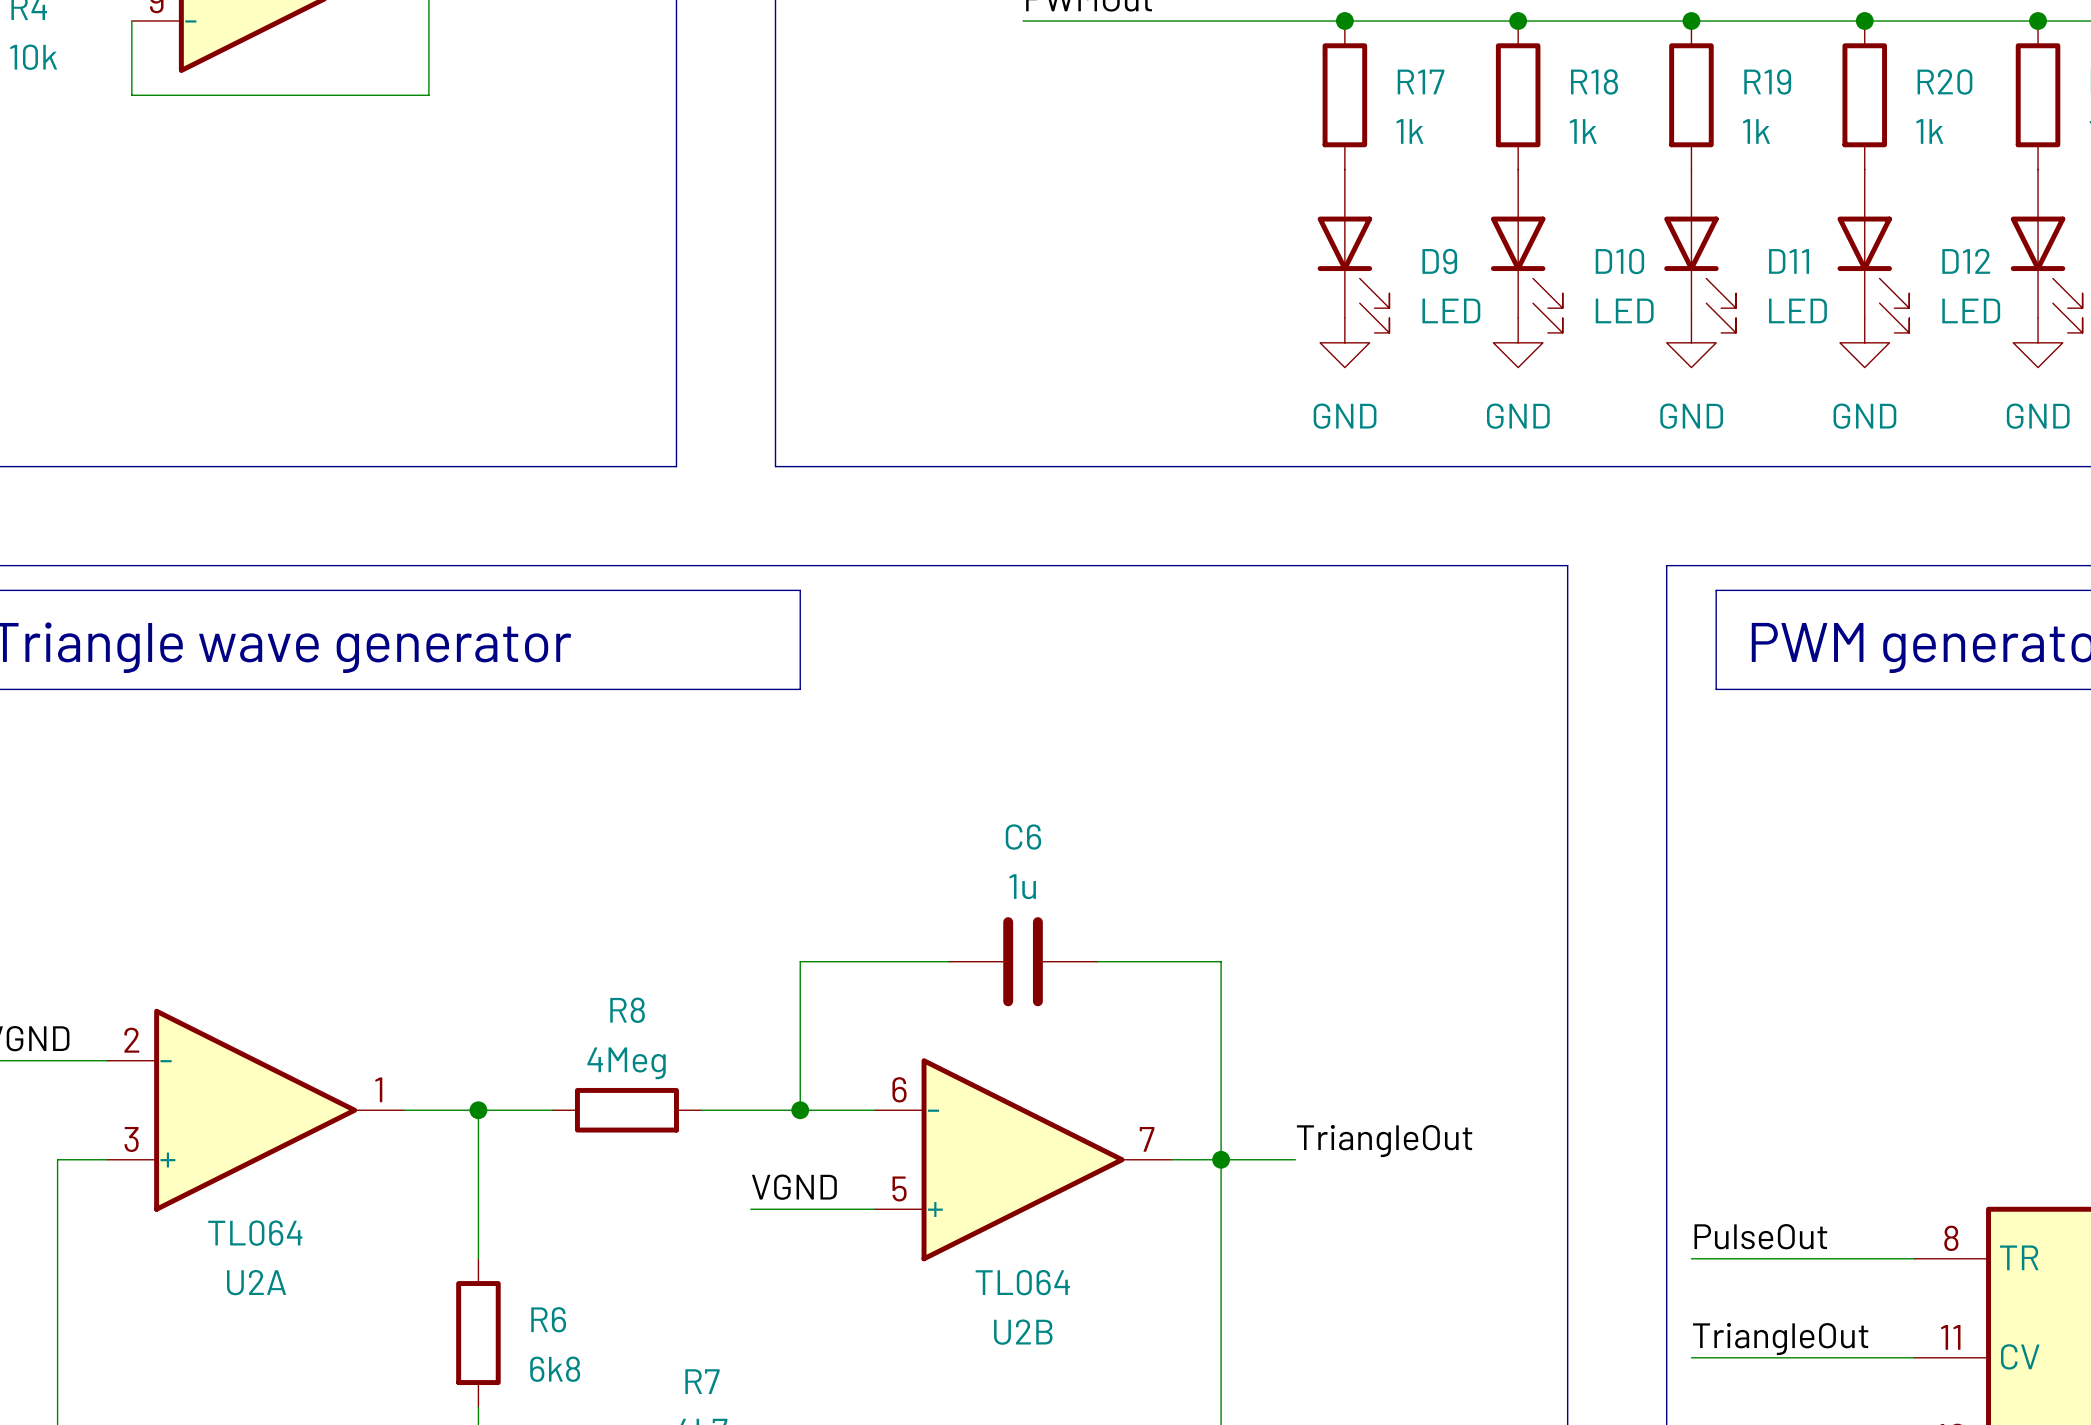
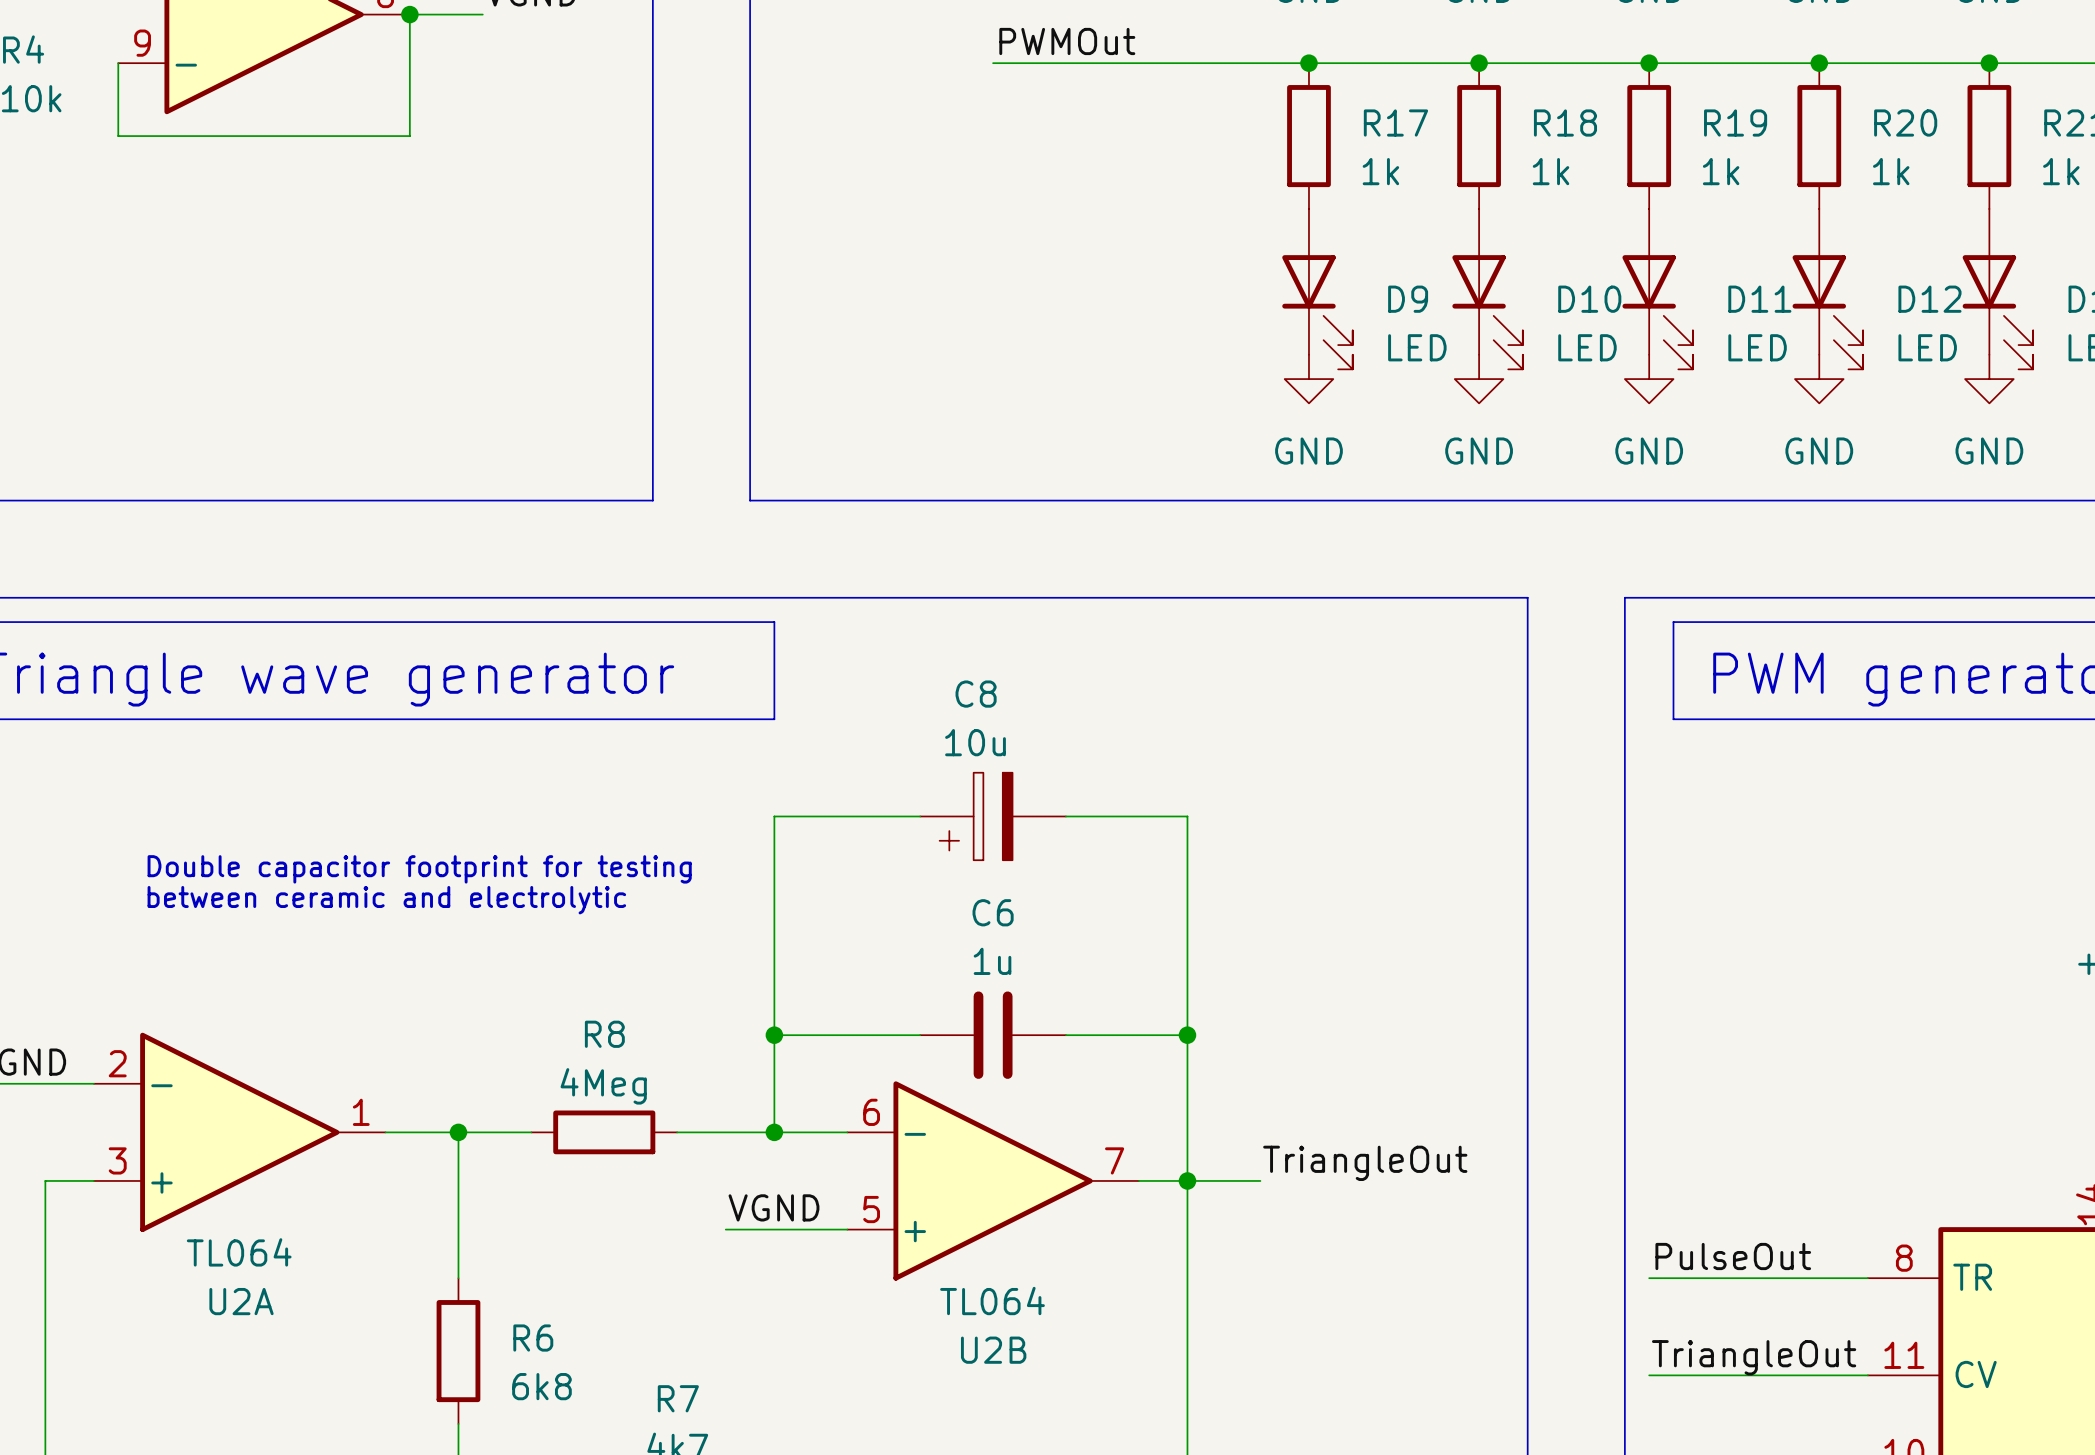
C8: none -> 10u (993, 816)
text: none -> Double capacitor footprint for testing (419, 869)
text: none -> between ceramic and electrolytic (386, 900)
wire: (800, 961) (948, 961) -> (774, 986) (774, 816) (920, 816)
C6 position: (1023, 961) -> (993, 1035)
wire: (1097, 961) (1221, 961) -> (1065, 816) (1187, 816) (1187, 986)
wire: none -> (774, 1035) (920, 1035)
junction: none -> (774, 1035)
wire: none -> (1065, 1035) (1187, 1035)
junction: none -> (1187, 1035)

